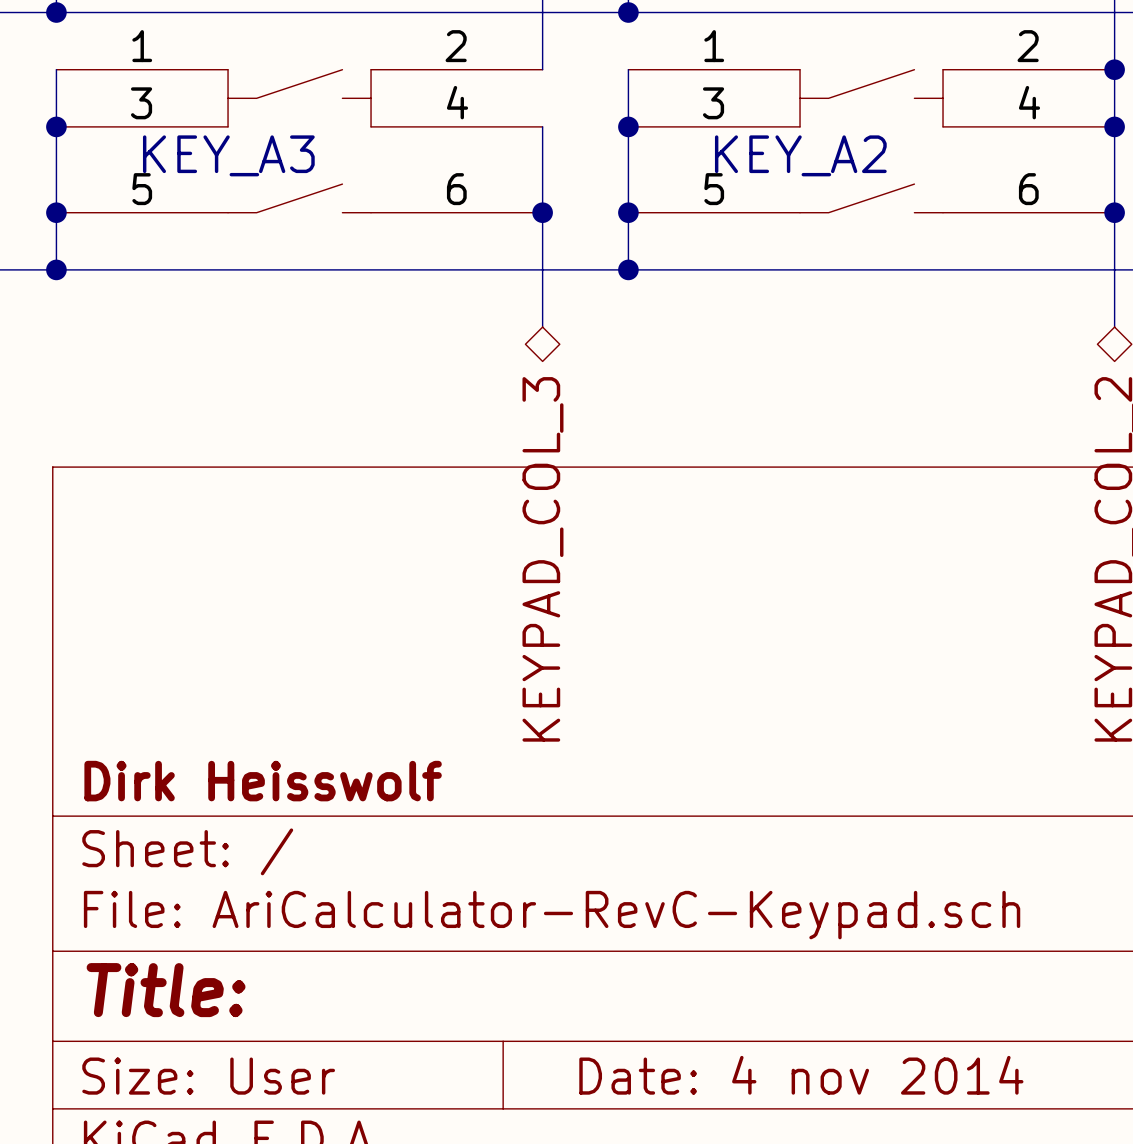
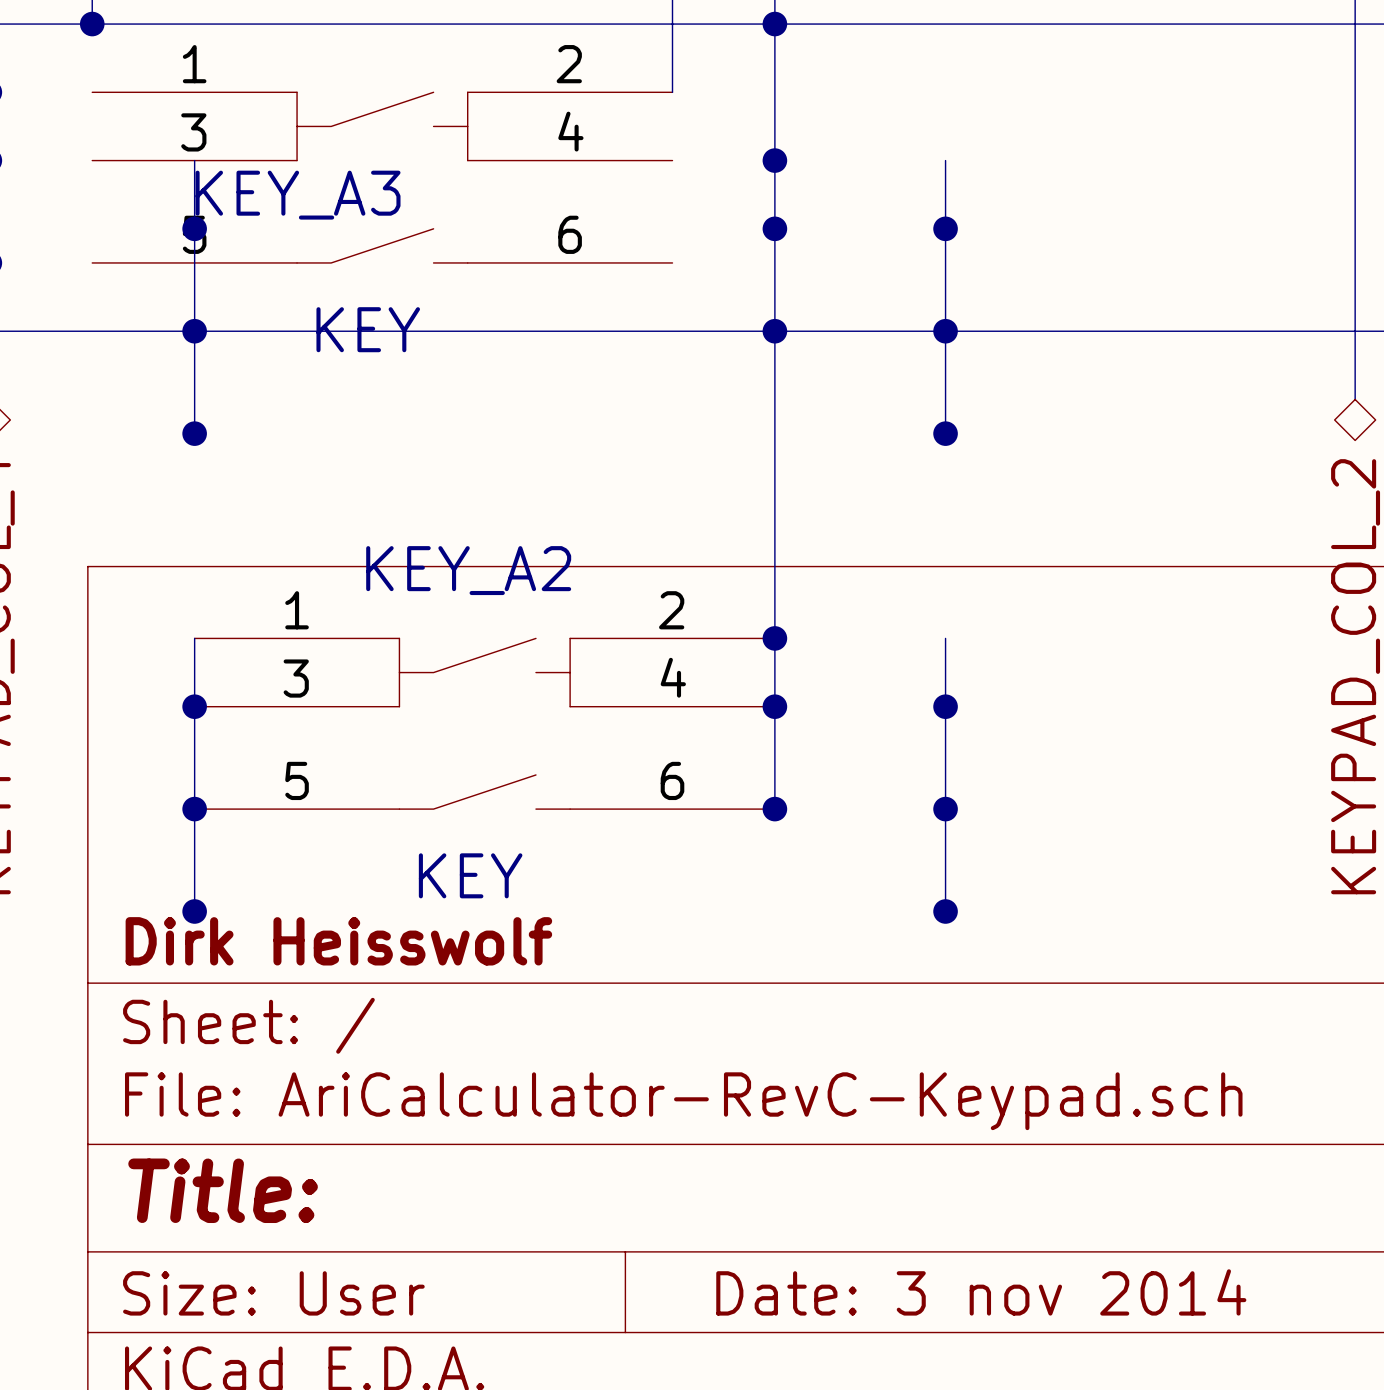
wire: none -> (774, 24) (774, 92)
wire: (56, 69) (56, 269) -> none
junction: (1114, 69) -> none
junction: (56, 126) -> none
wire: none -> (194, 160) (194, 433)
wire: (542, 126) (542, 327) -> none
wire: none -> (945, 160) (945, 433)
junction: (1114, 126) -> none
KEY_A2 position: (871, 141) -> (484, 723)
KEY_A2 name position: KEY_A2 (800, 155) -> KEY_A2 (468, 570)
junction: none -> (194, 228)
junction: none -> (945, 228)
junction: (56, 212) -> none
junction: (542, 212) -> none
junction position: (628, 212) -> (774, 228)
junction: (1114, 212) -> none
KEY_A3 value: none -> KEY (368, 329)
junction: (56, 269) -> none
junction: none -> (194, 331)
wire: none -> (774, 331) (774, 809)
junction: none -> (945, 331)
junction: none -> (194, 433)
junction: none -> (945, 433)
wire: none -> (194, 638) (194, 911)
junction: none -> (774, 638)
wire: none -> (945, 638) (945, 911)
hierarchical label: KEYPAD_COL_3 (542, 559) -> none
junction: none -> (194, 706)
junction: none -> (774, 706)
junction: none -> (945, 706)
junction: none -> (194, 809)
junction: none -> (774, 809)
junction: none -> (945, 809)
KEY_A2 value: none -> KEY (470, 875)
junction: none -> (194, 911)
junction: none -> (945, 911)
title block: Date: 4 nov 2014 (801, 1075) -> Date: 3 nov 2014 (981, 1292)

